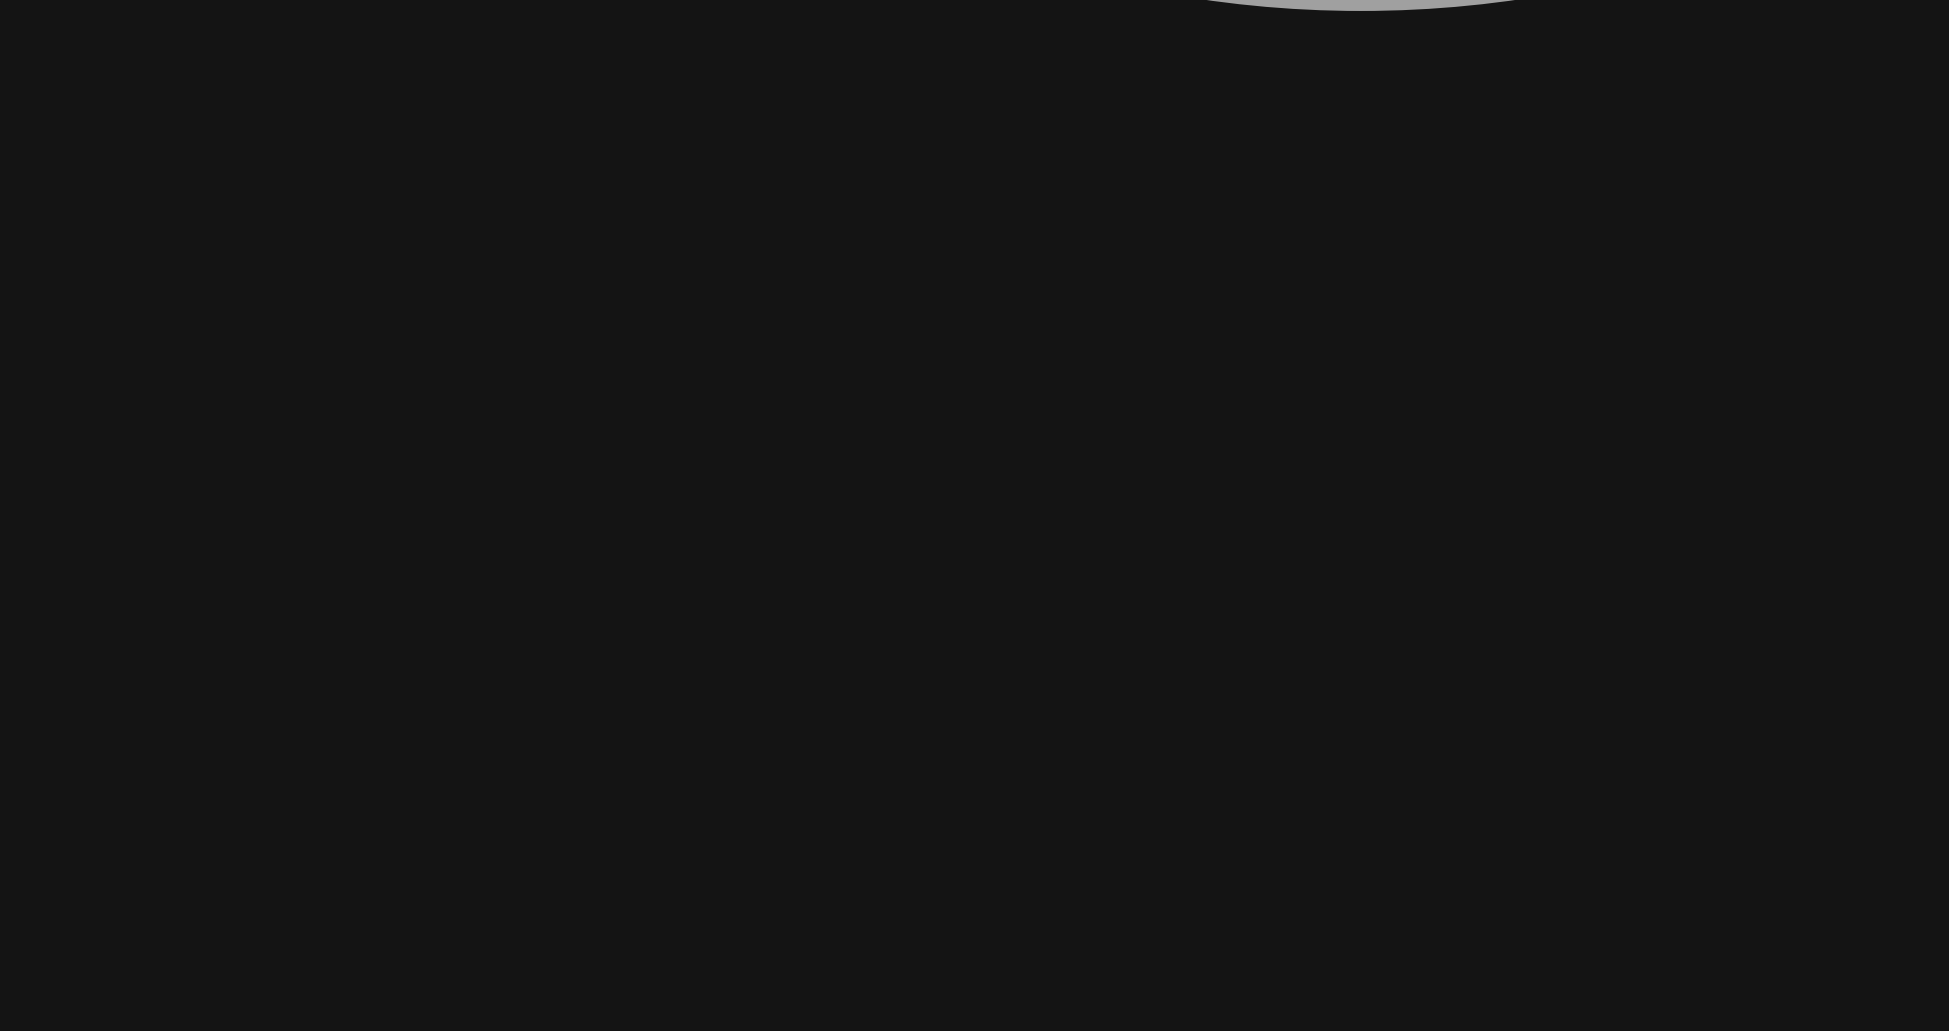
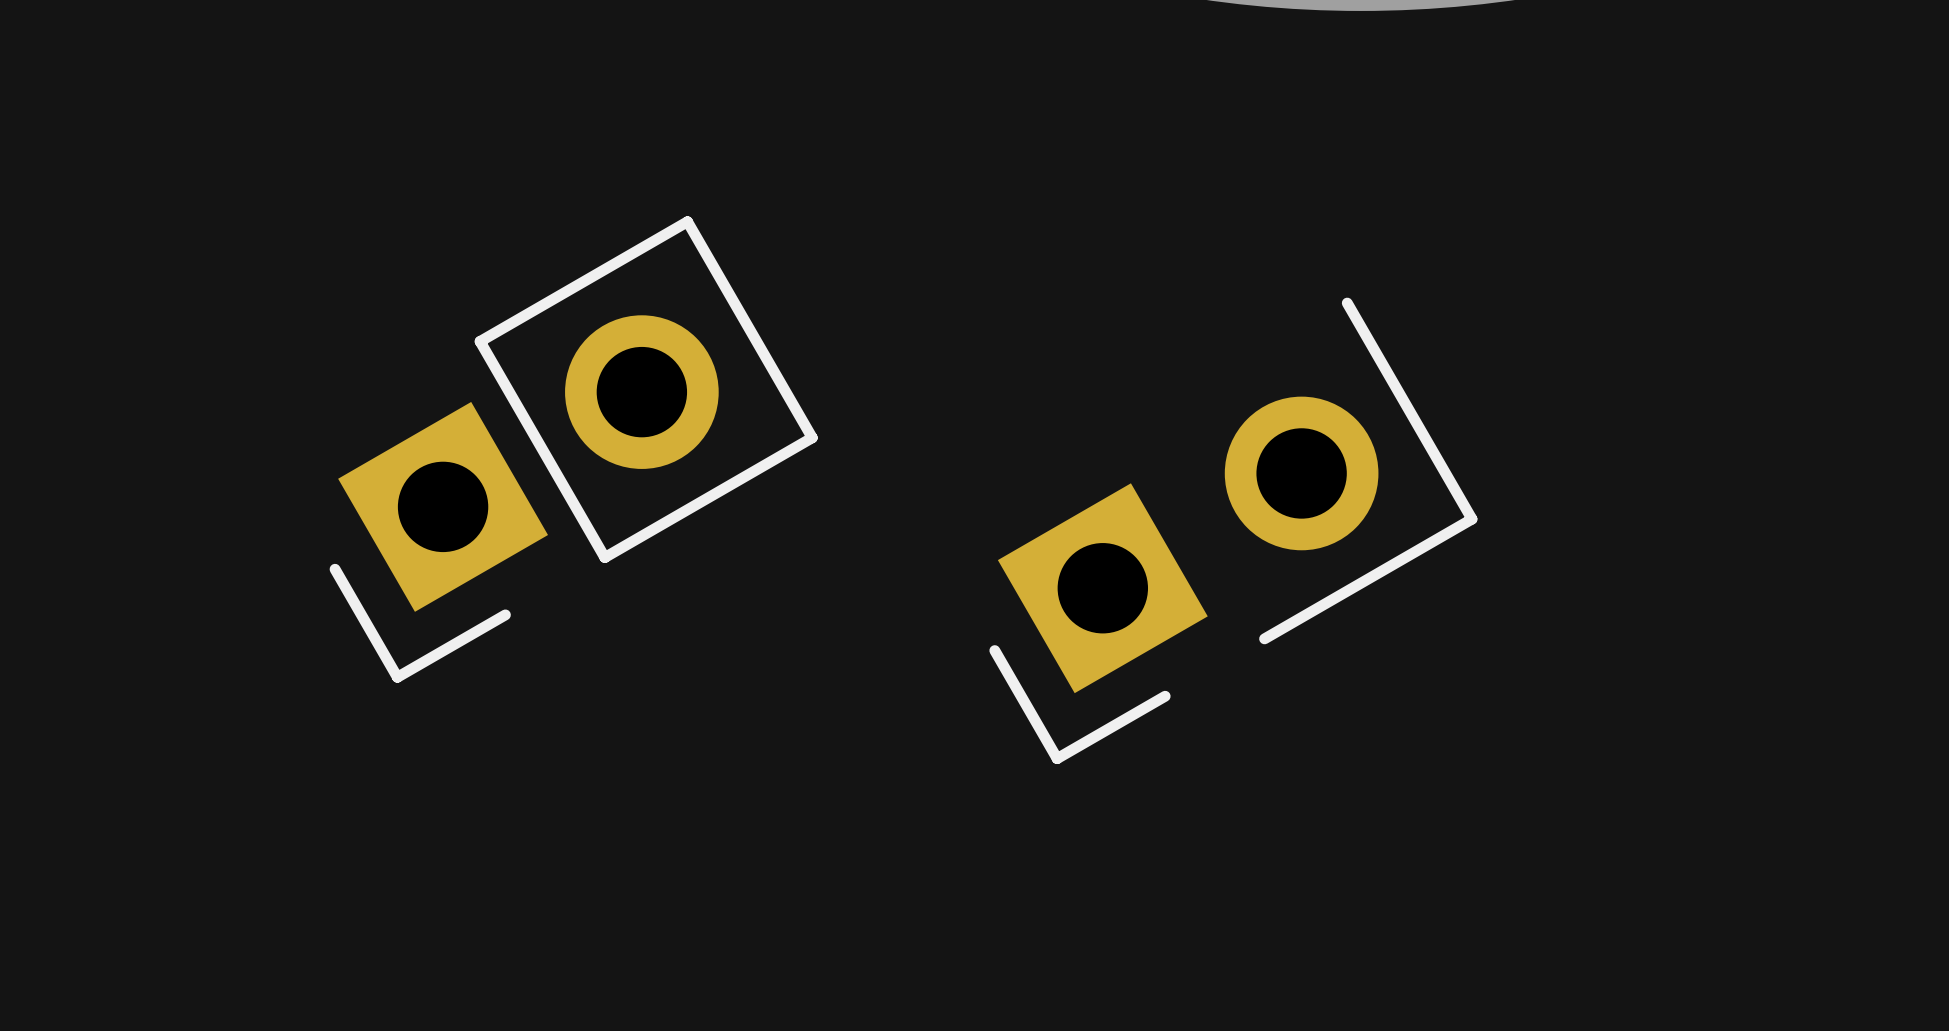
part: none -> (573, 449)
part: none -> (1233, 530)

